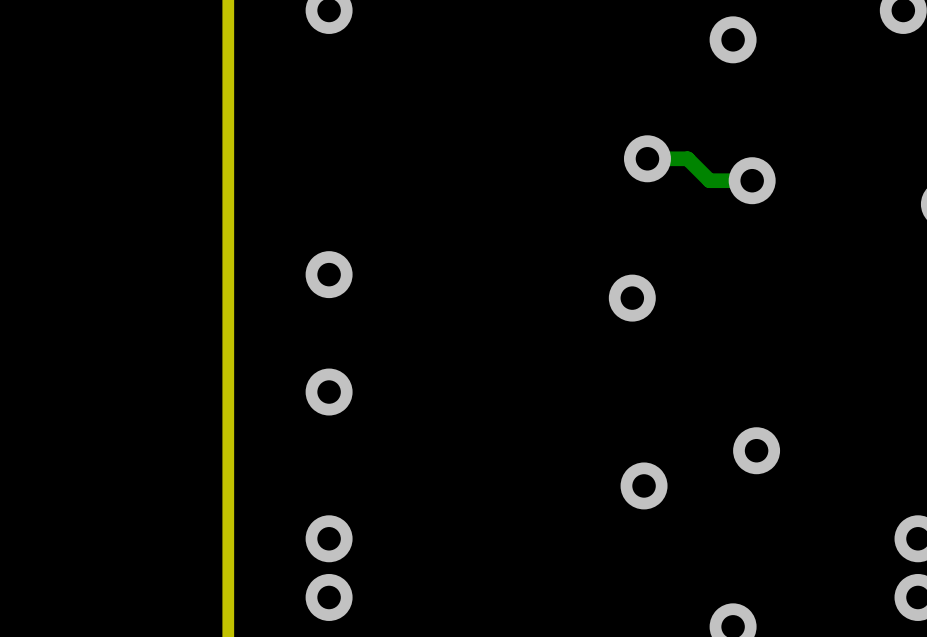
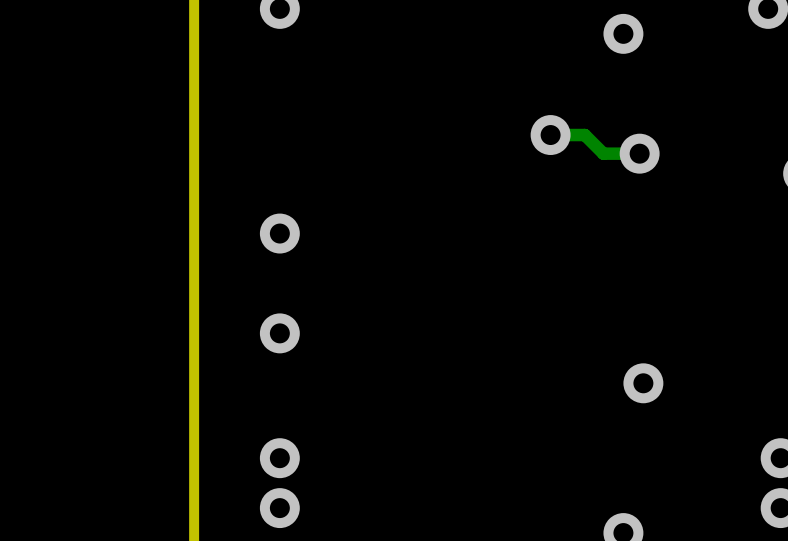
via: (632, 298) -> none
via: (644, 485) -> none

